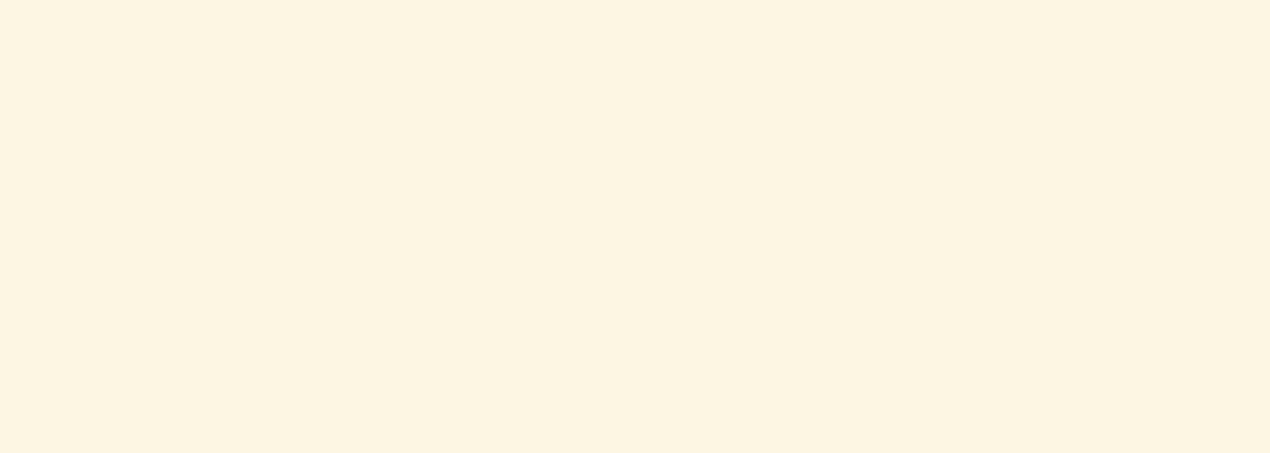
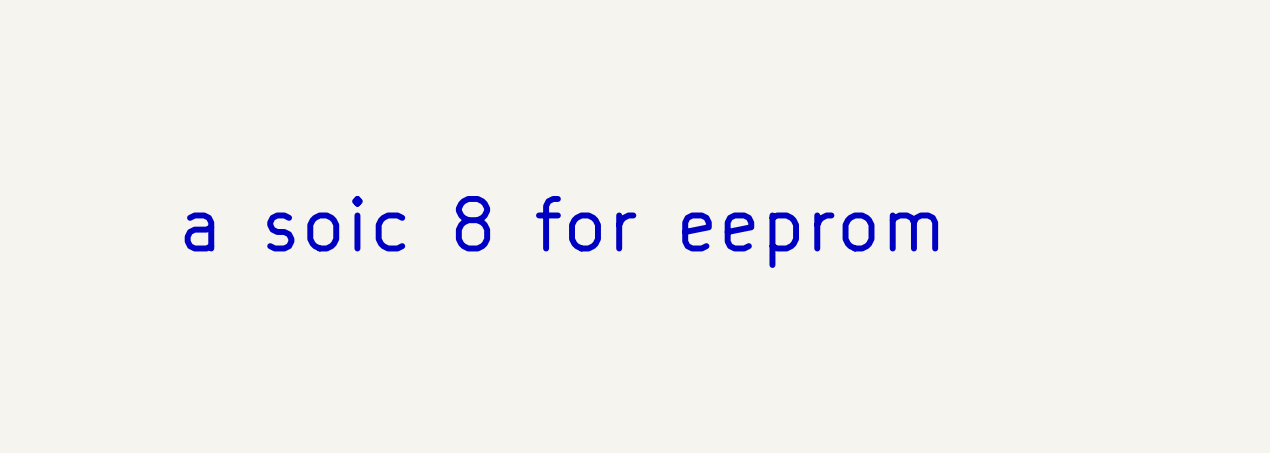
text: none -> a soic 8 for eeprom (561, 231)

